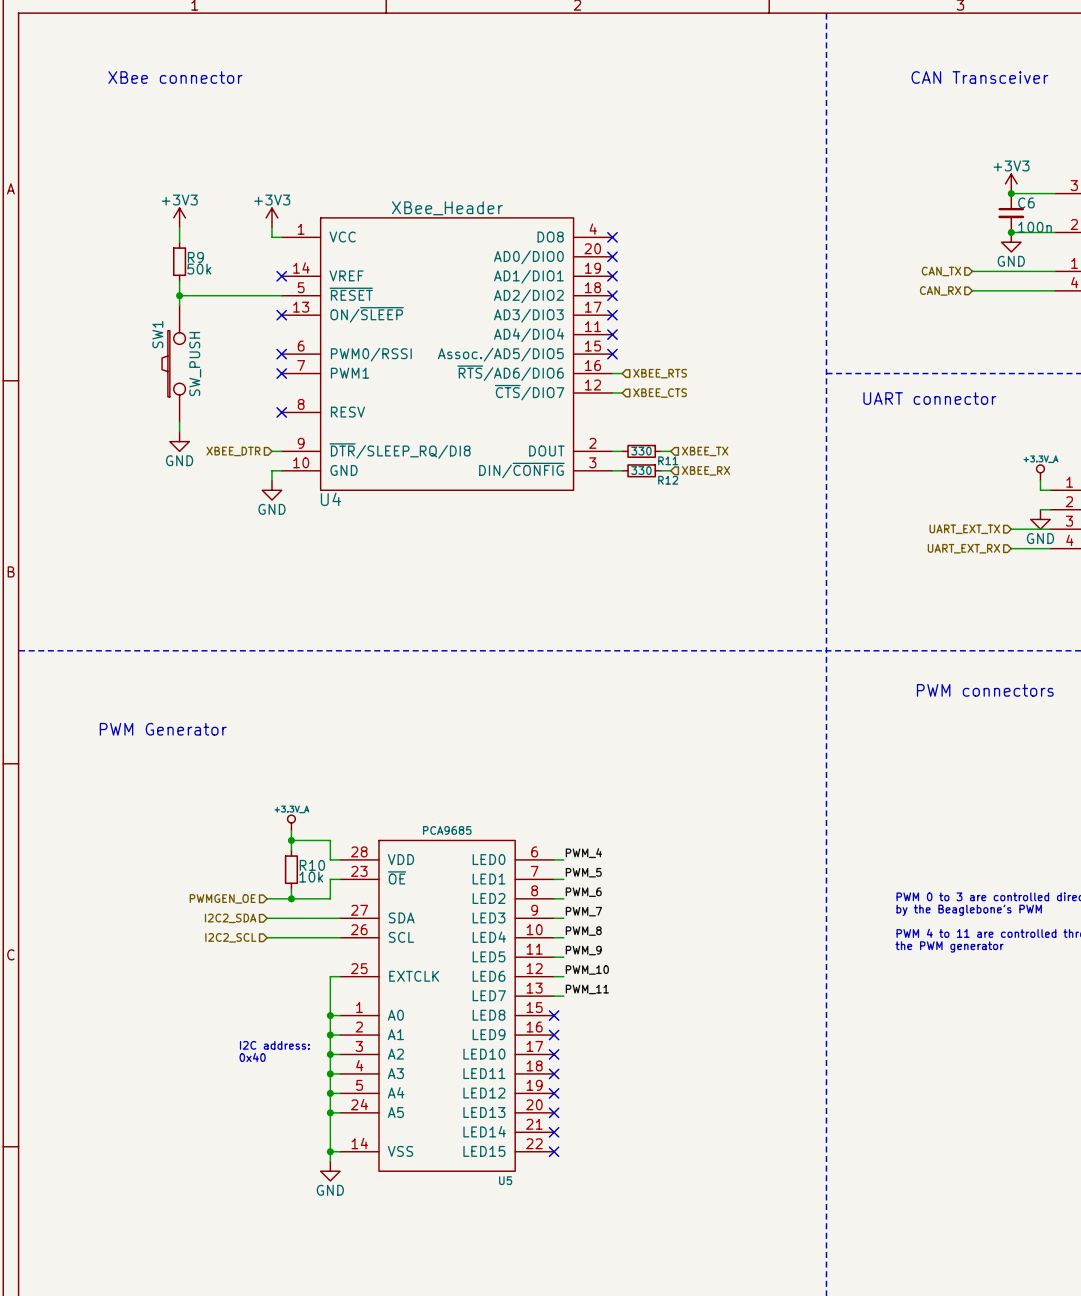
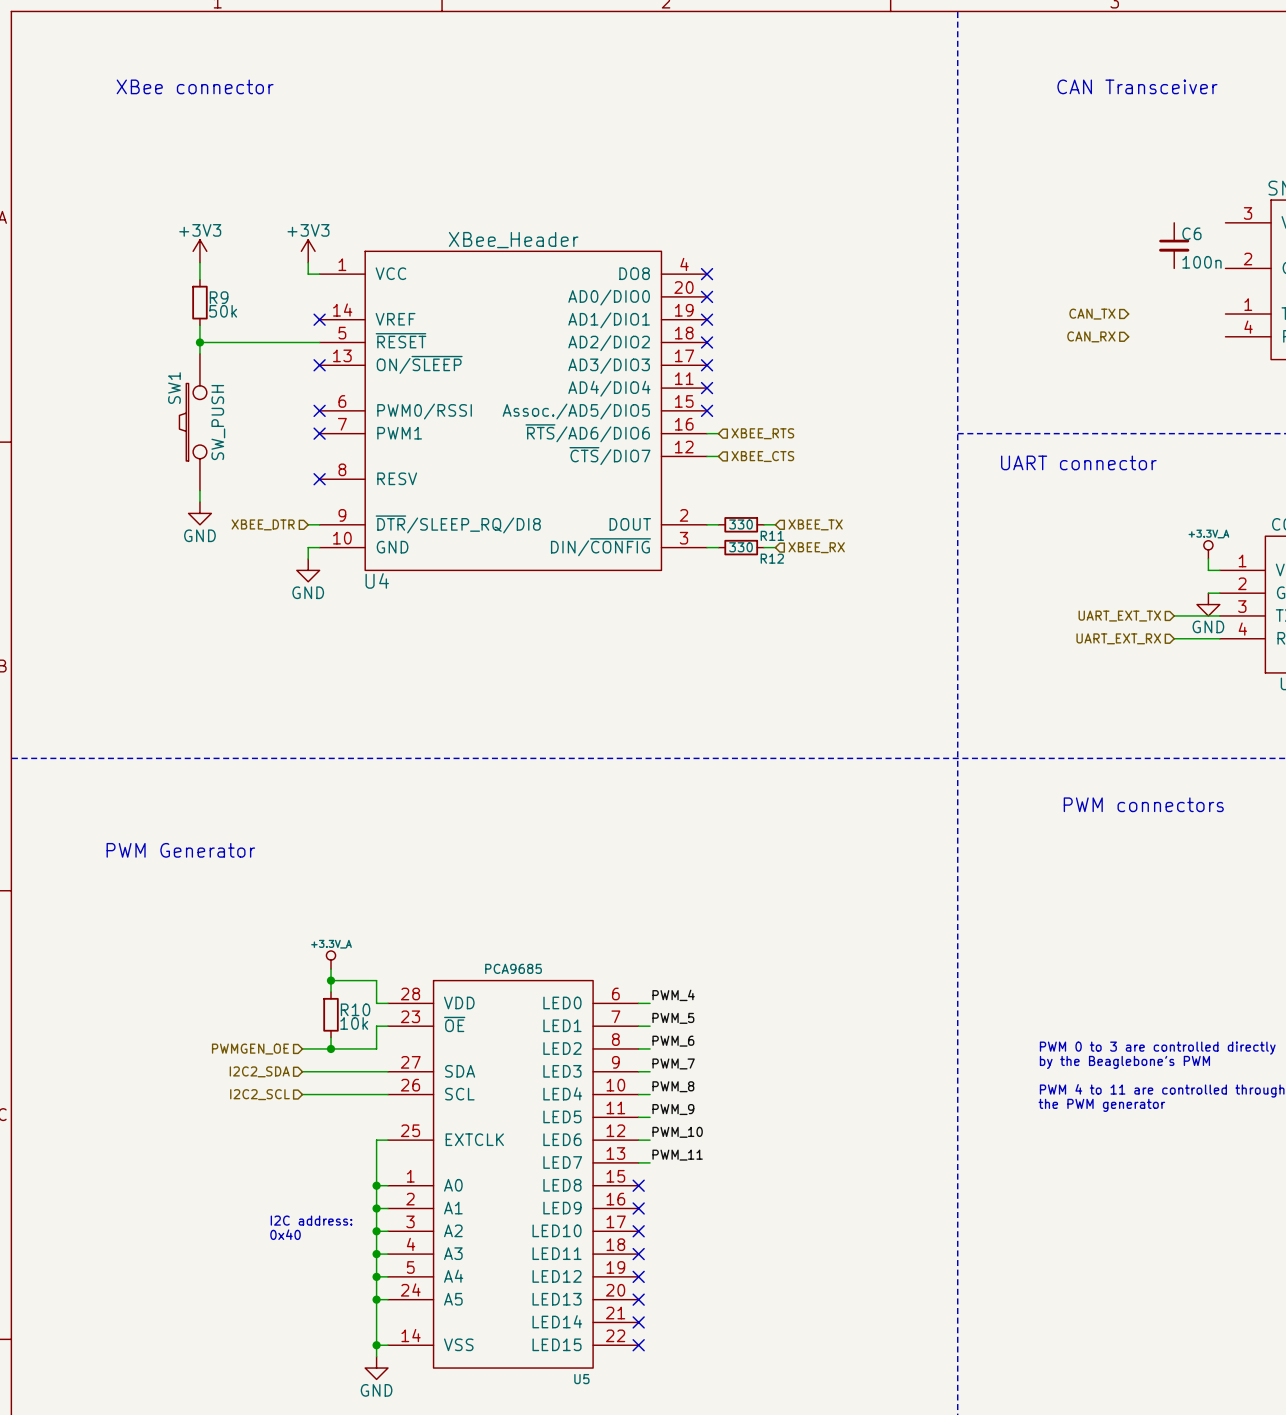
power symbol: +3V3 (1011, 183) -> none
wire: (1011, 193) (1055, 193) -> none
junction: (1011, 193) -> none
wire: (1011, 232) (1055, 232) -> none
junction: (1011, 232) -> none
power symbol: GND (1011, 242) -> none
wire: (972, 271) (1055, 271) -> none
wire: (972, 290) (1055, 290) -> none

